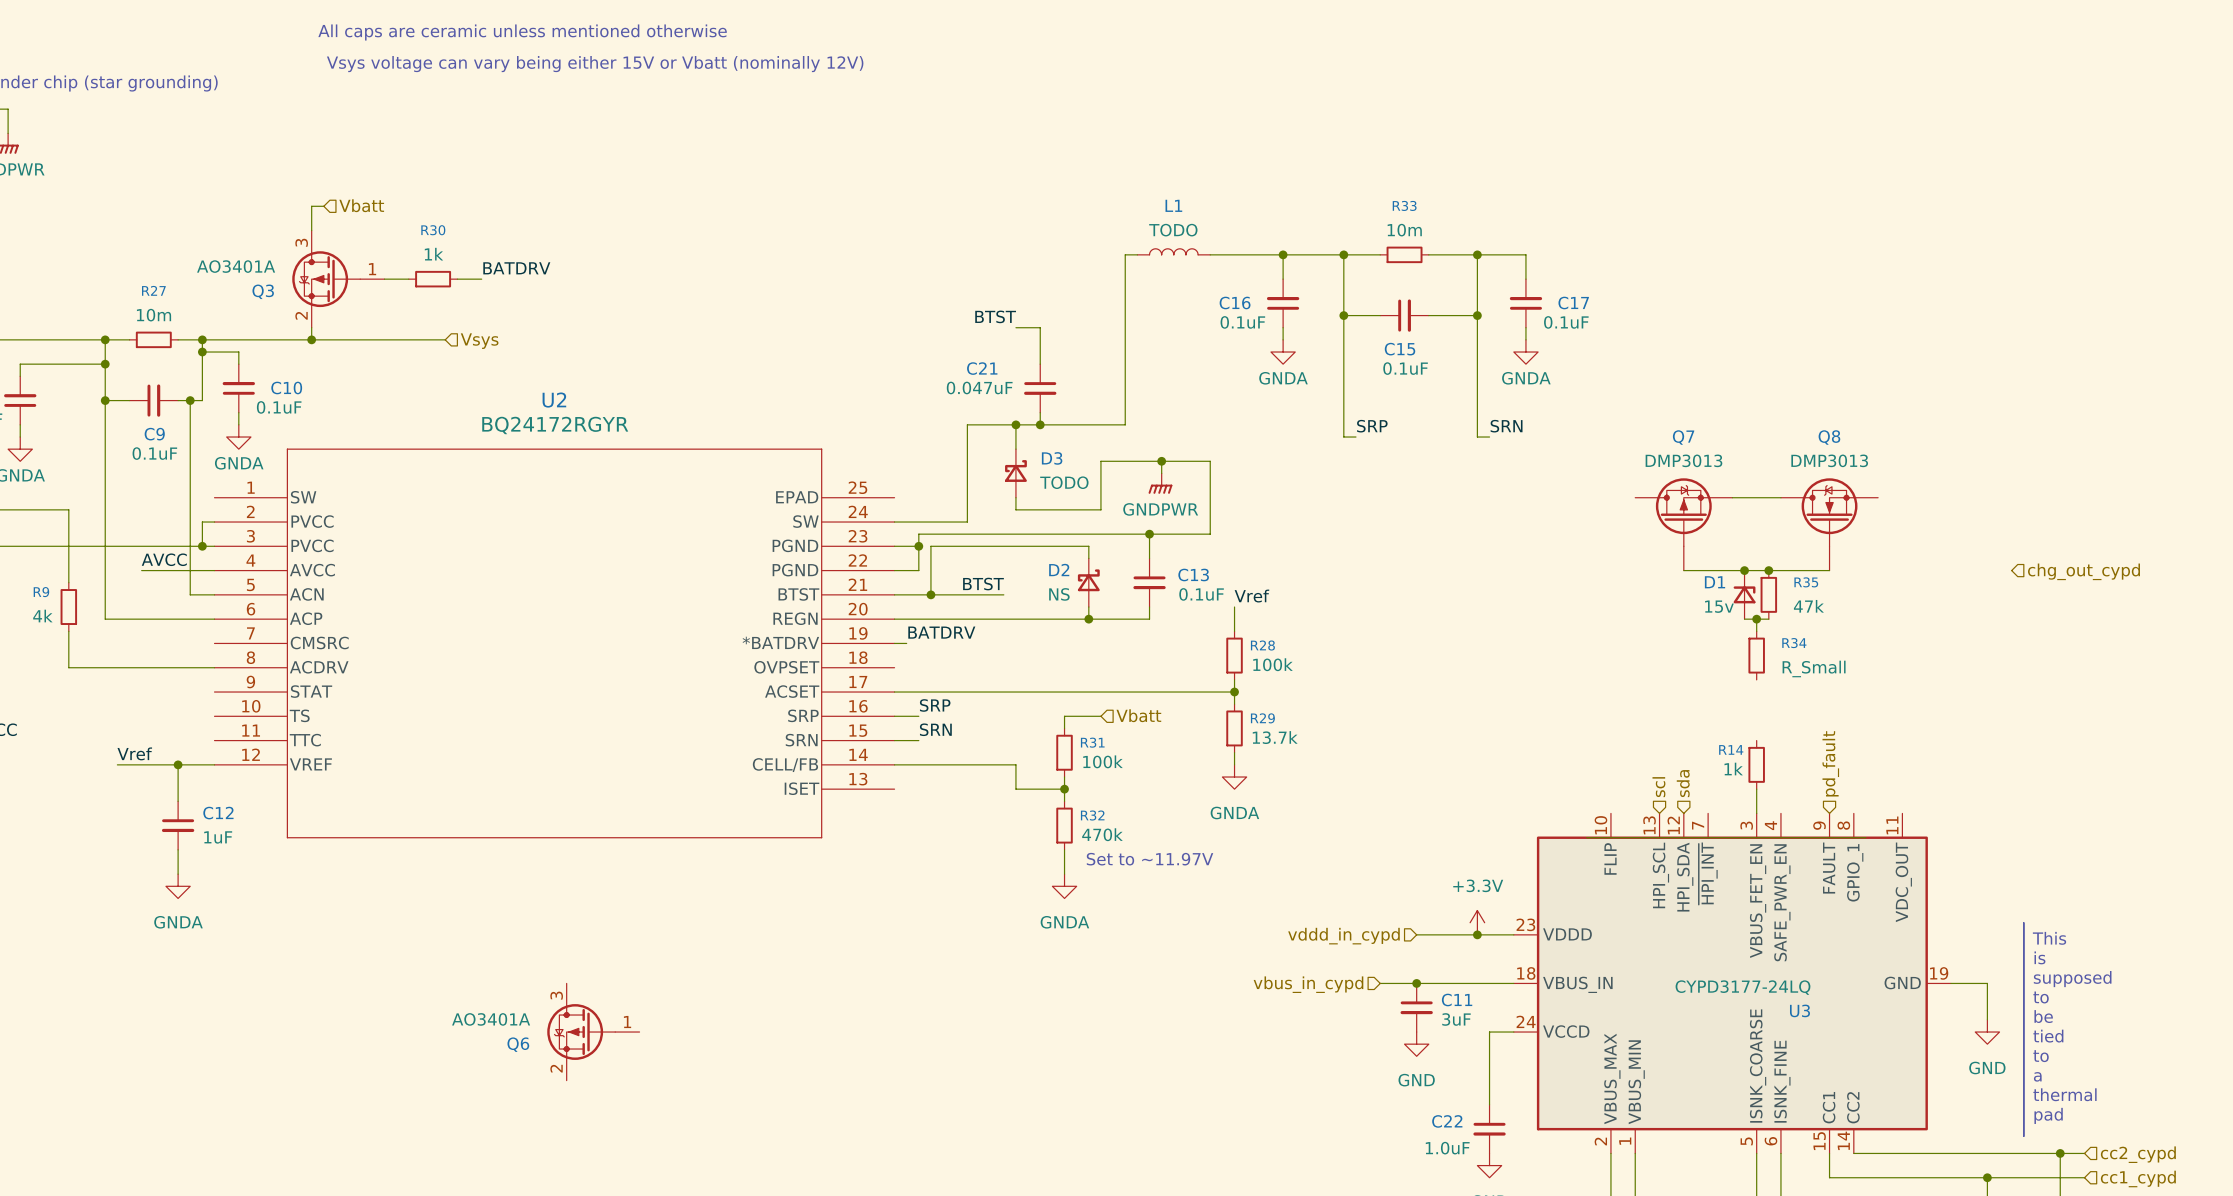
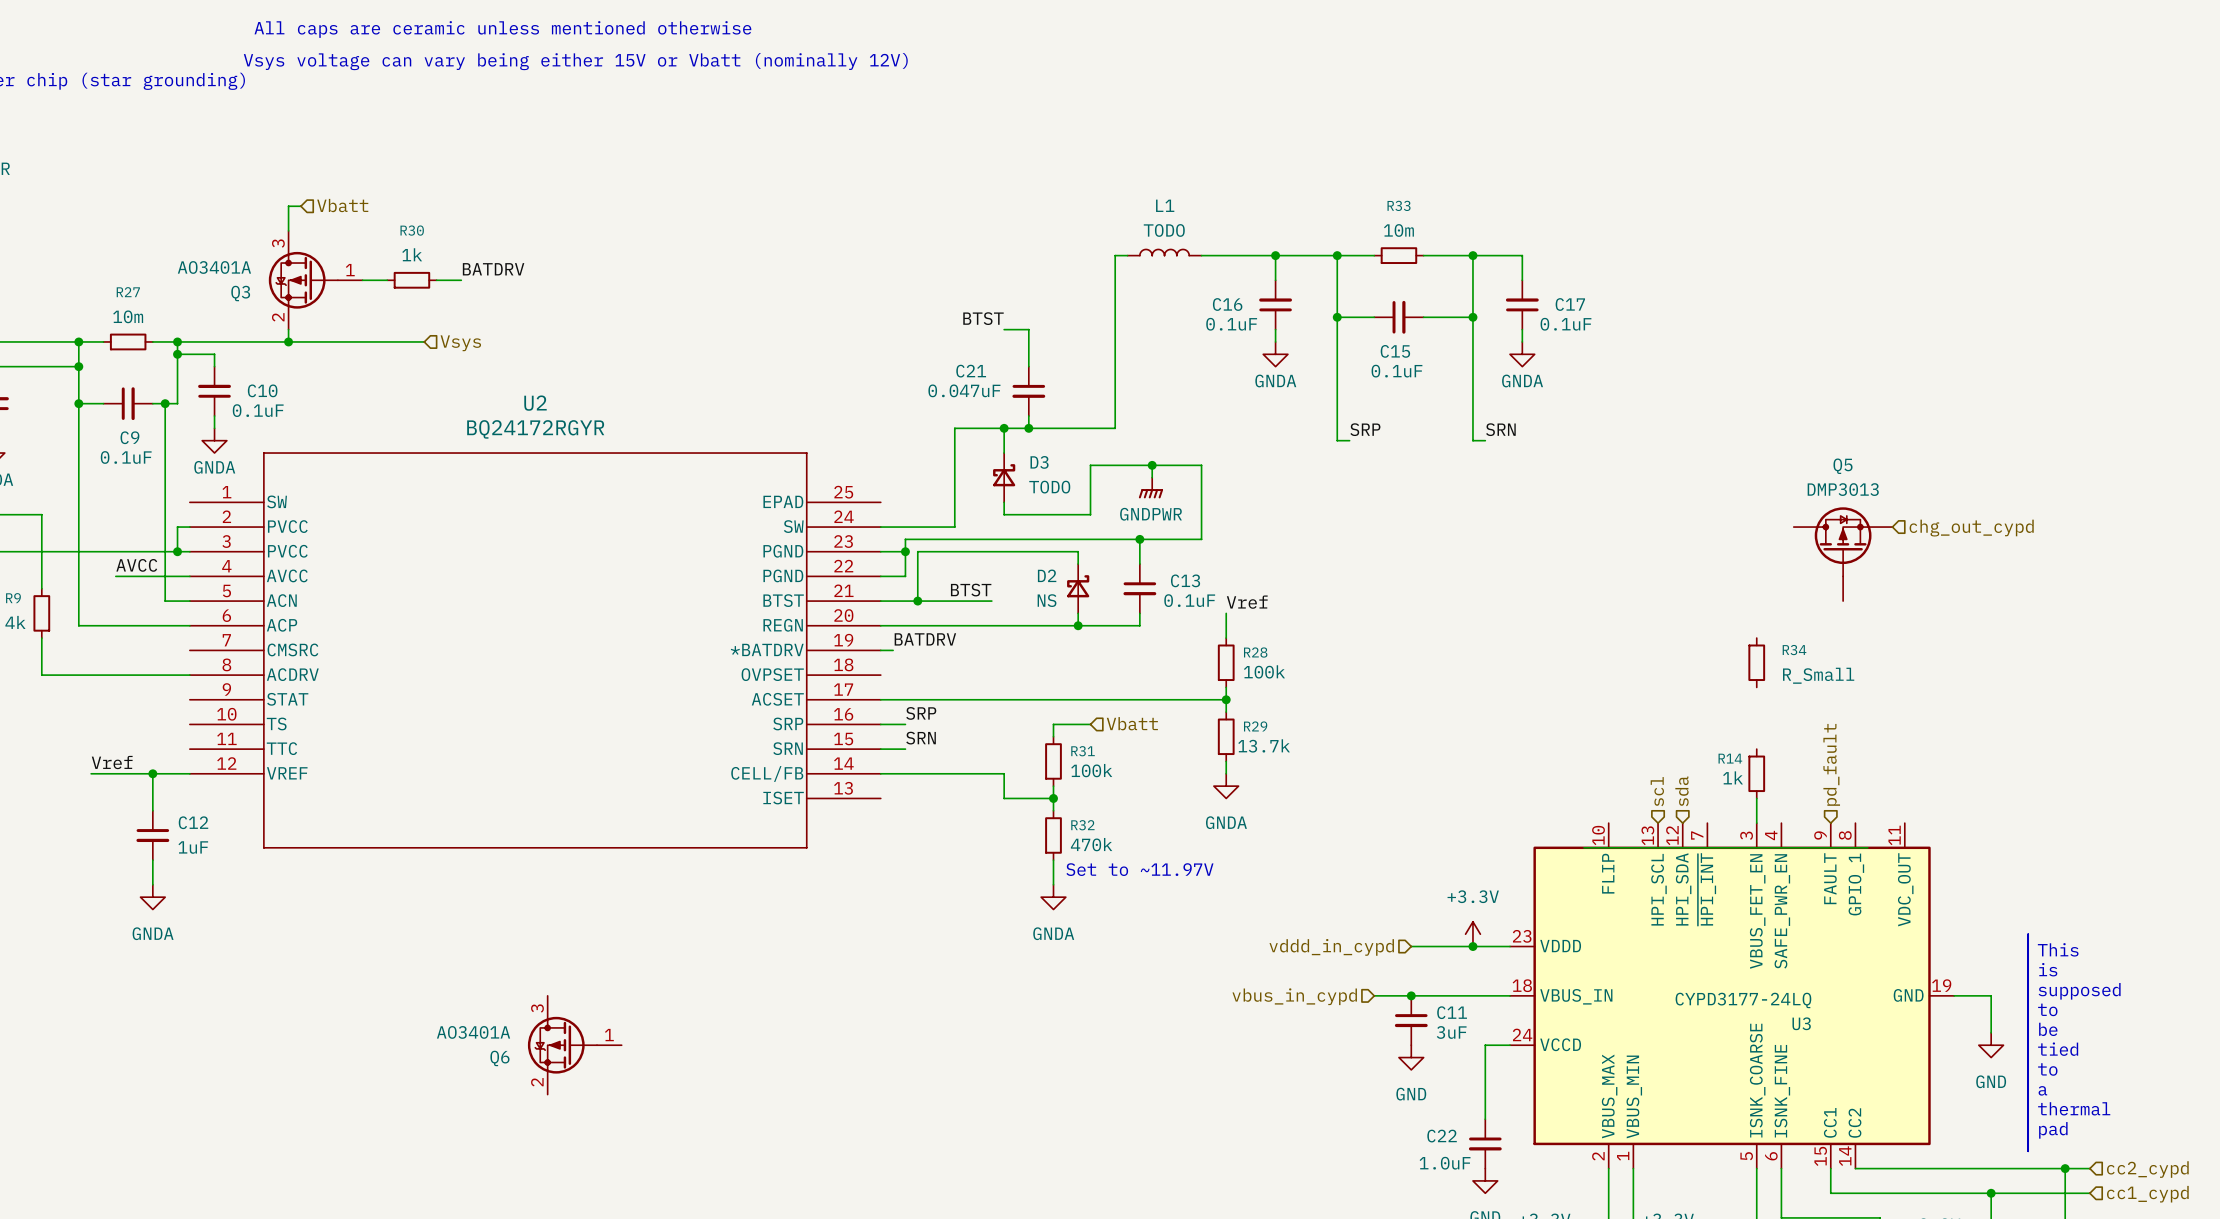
wire: (1732, 497) (1780, 497) -> none
Q7: DMP3013 (1683, 524) -> none
Q8: DMP3013 (1829, 524) -> none
Q5: none -> DMP3013 (1843, 554)
wire: (1683, 570) (1829, 570) -> none
junction: (1744, 570) -> none
junction: (1768, 570) -> none
hierarchical label position: chg_out_cypd (2083, 571) -> chg_out_cypd (1971, 528)
D1: 15v (1744, 594) -> none
R35: 47k (1768, 594) -> none
wire: (1744, 619) (1768, 619) -> none
wire: (1756, 619) (1756, 631) -> none
junction: (1756, 619) -> none

